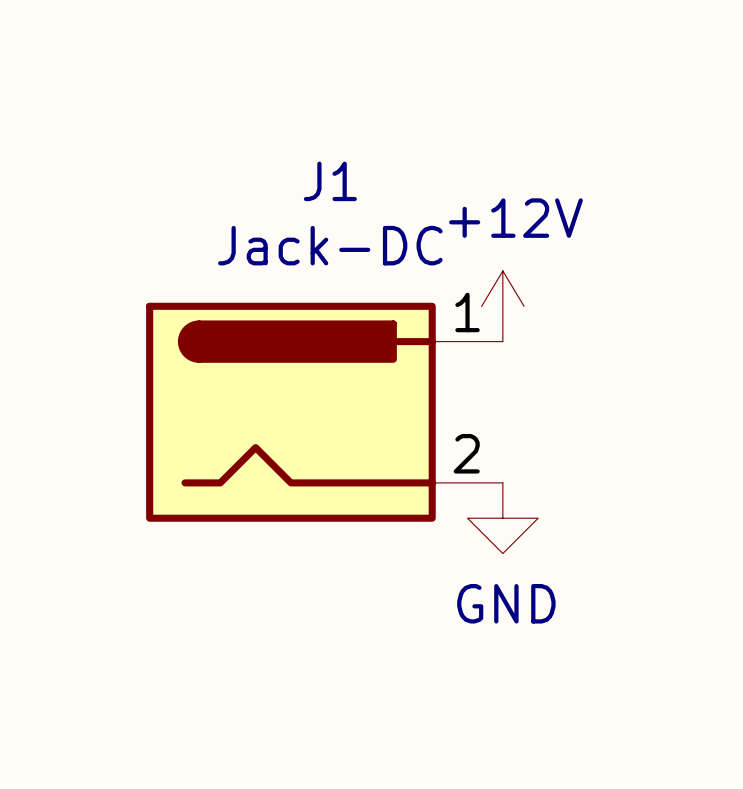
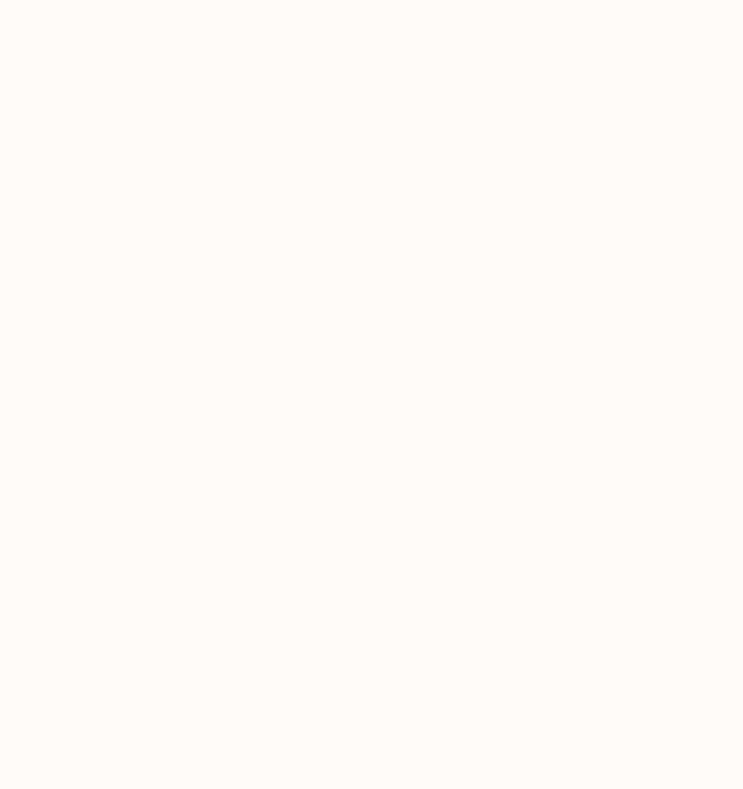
power symbol: +12V (502, 306) -> none
J1: Jack-DC (324, 412) -> none
power symbol: GND (502, 518) -> none

